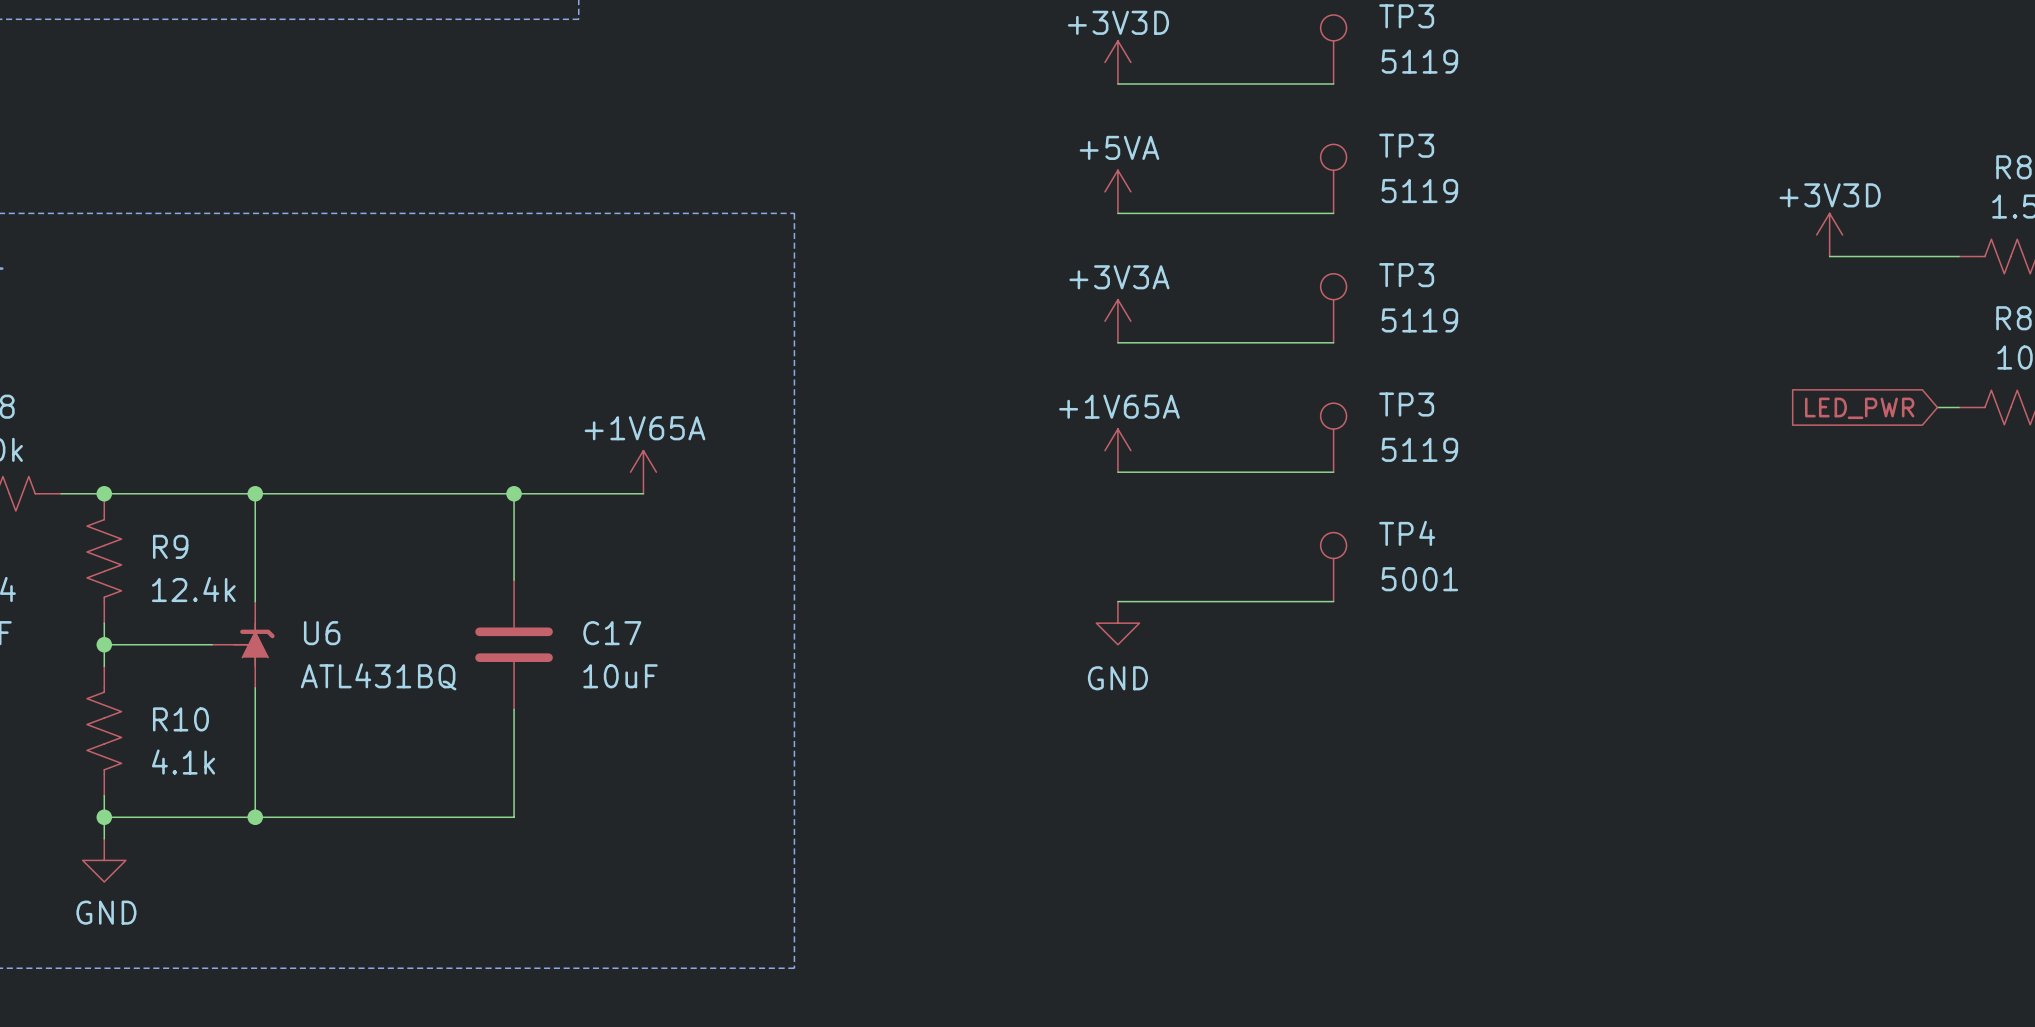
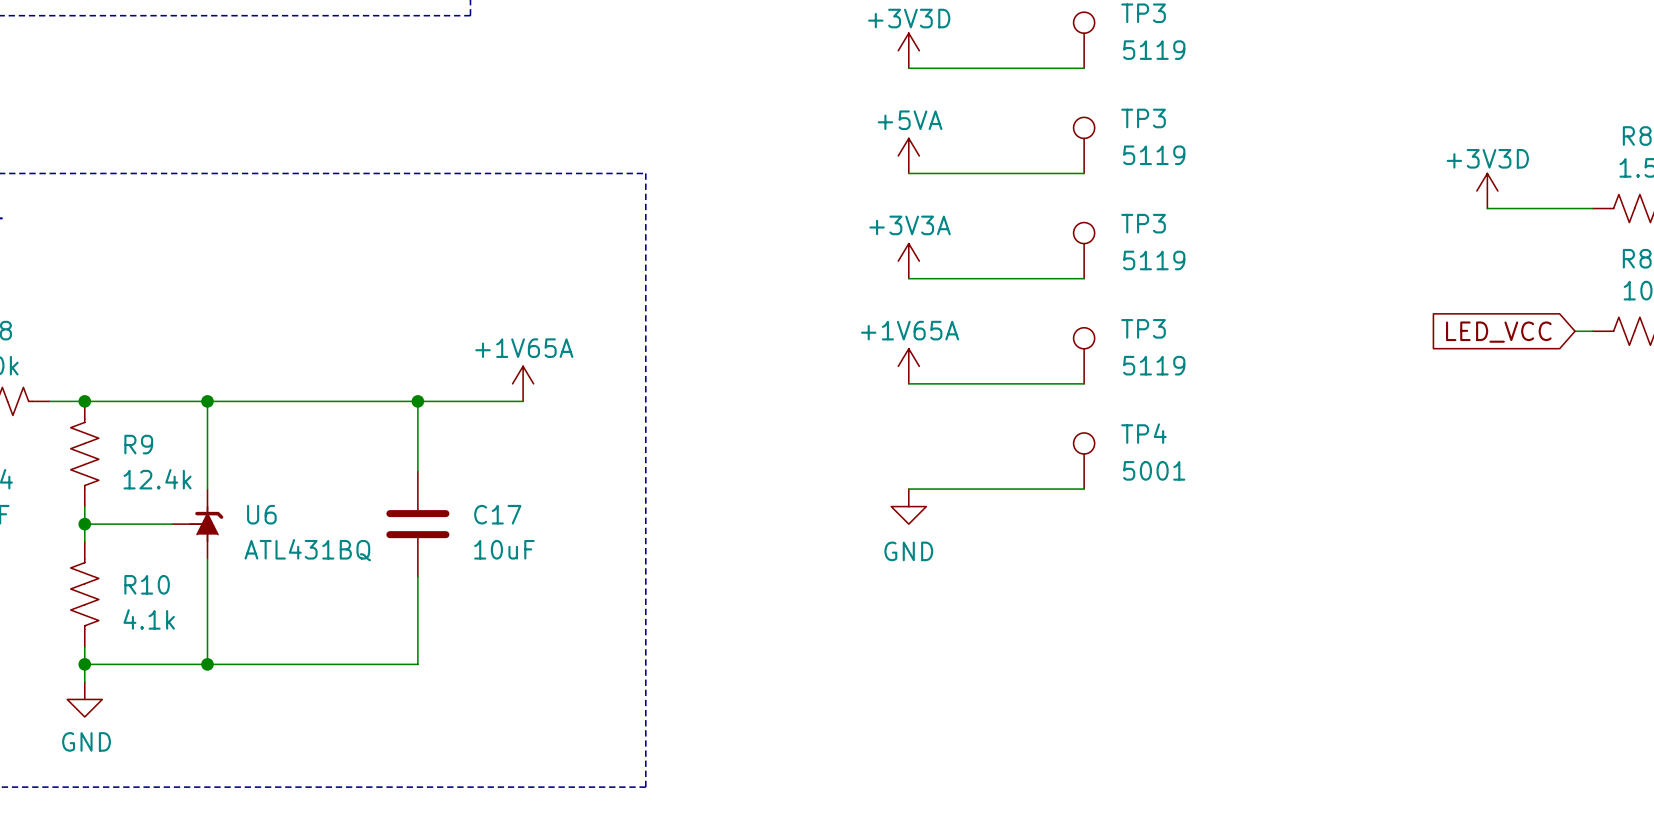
global label: LED_PWR (1859, 408) -> LED_VCC (1498, 332)

